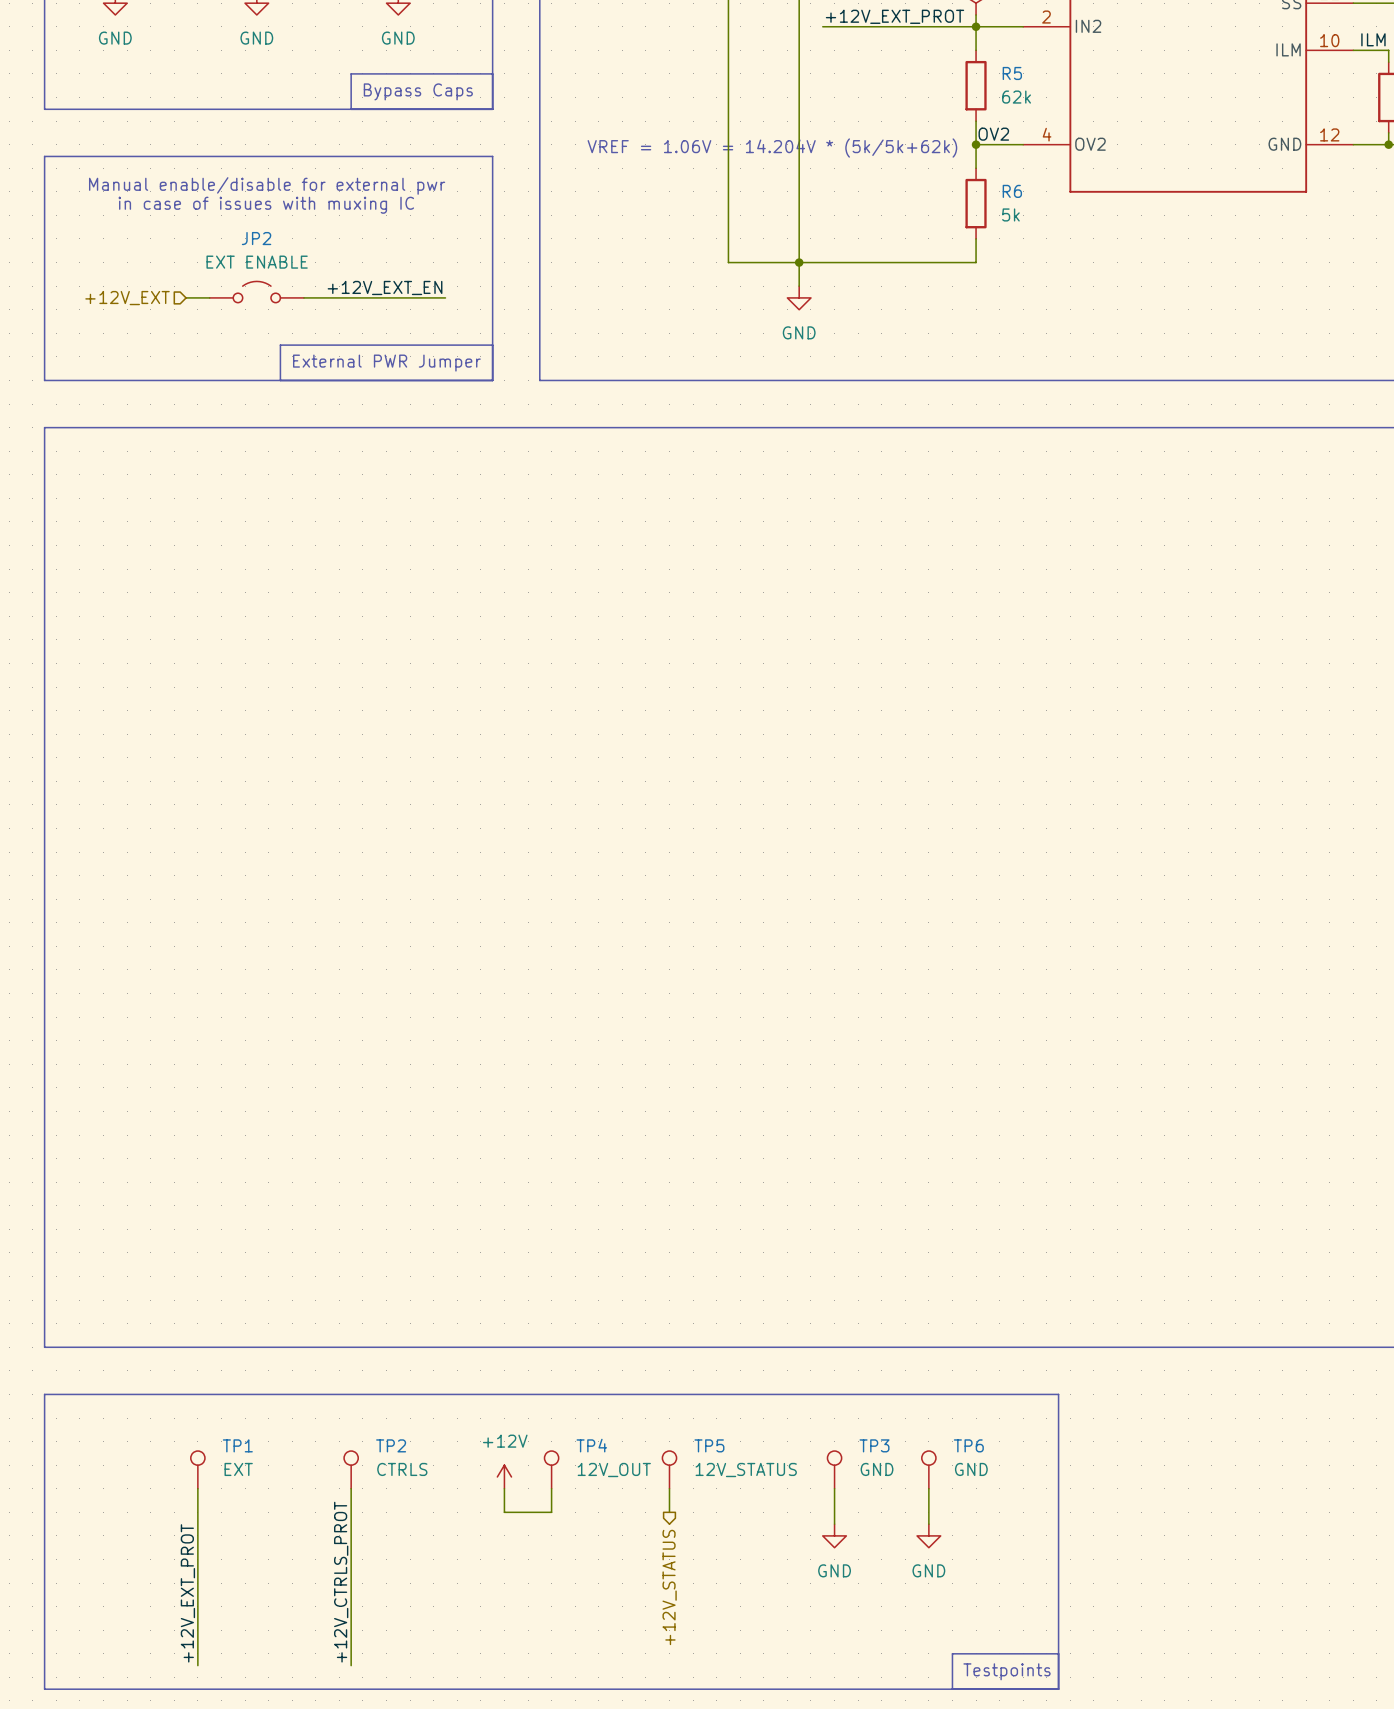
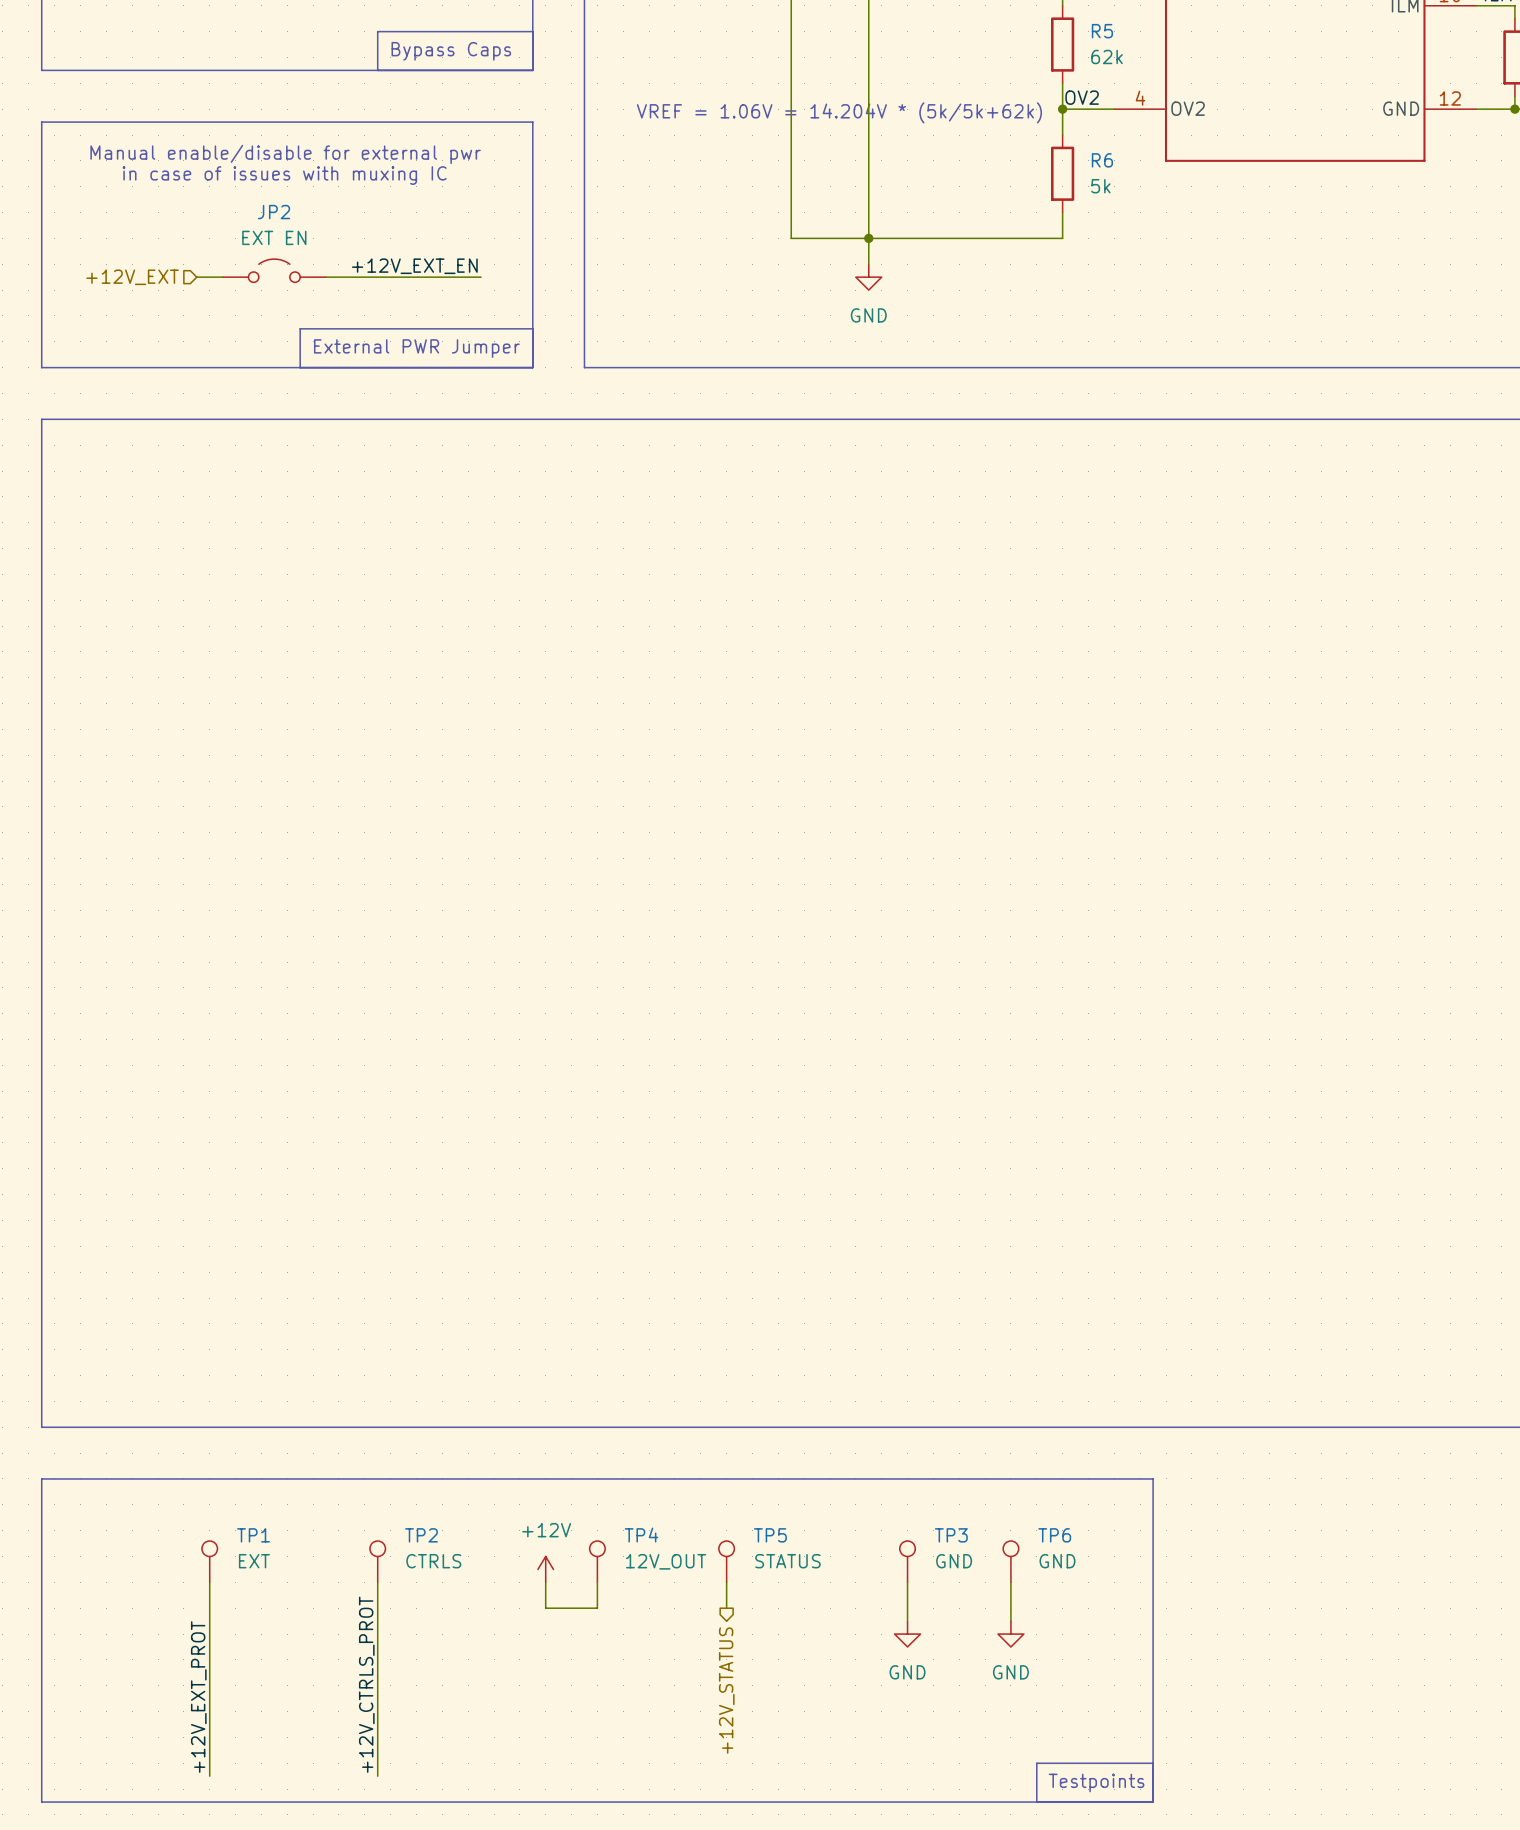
JP2 value: EXT ENABLE (257, 262) -> EXT EN (274, 237)
TP5 value: 12V_STATUS (746, 1470) -> STATUS (787, 1561)

